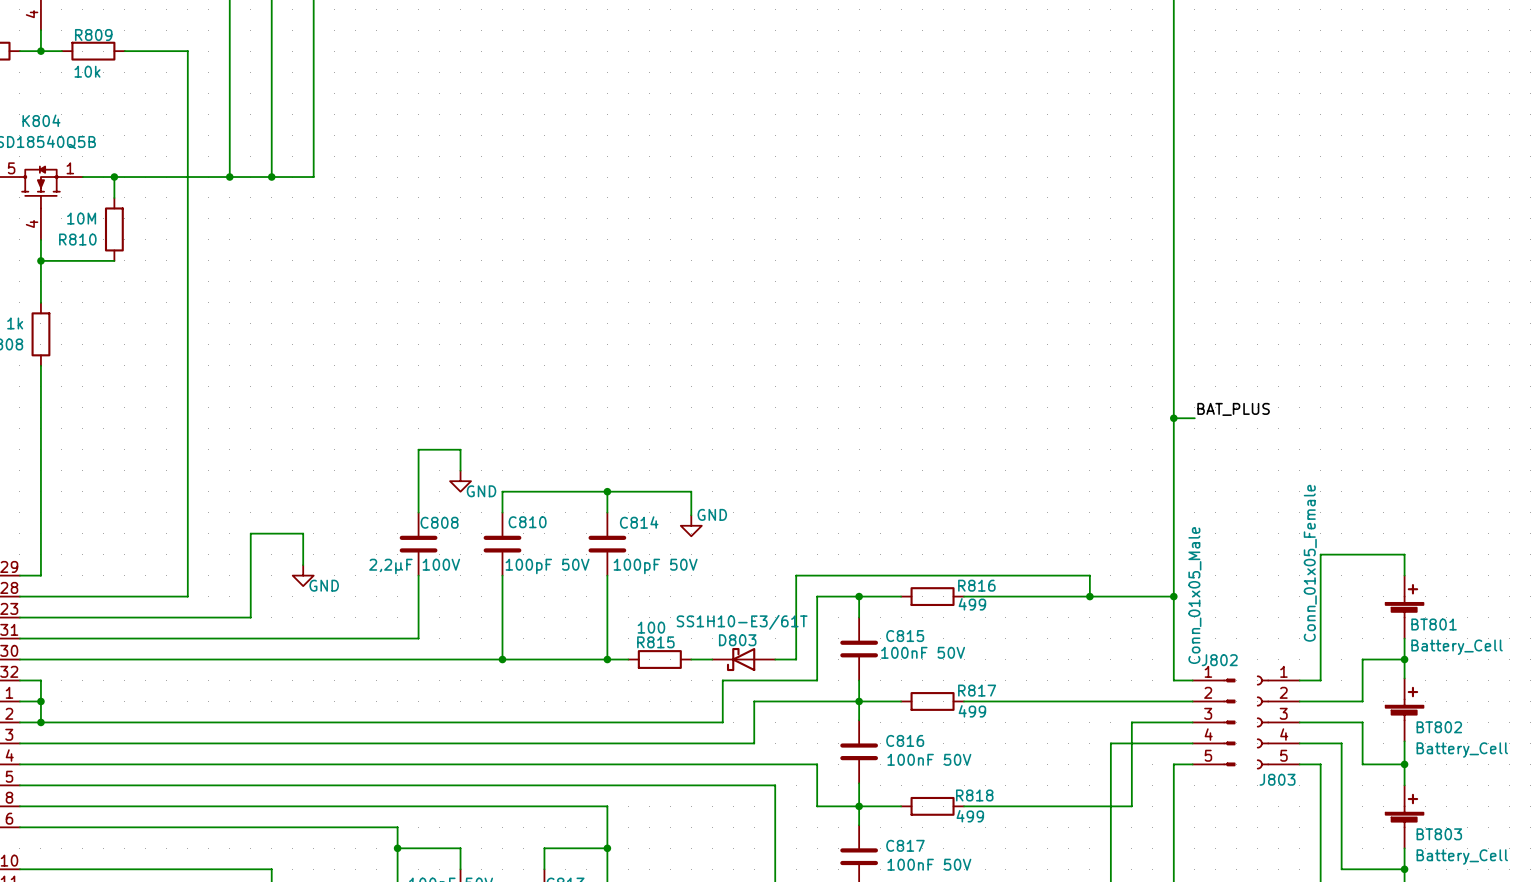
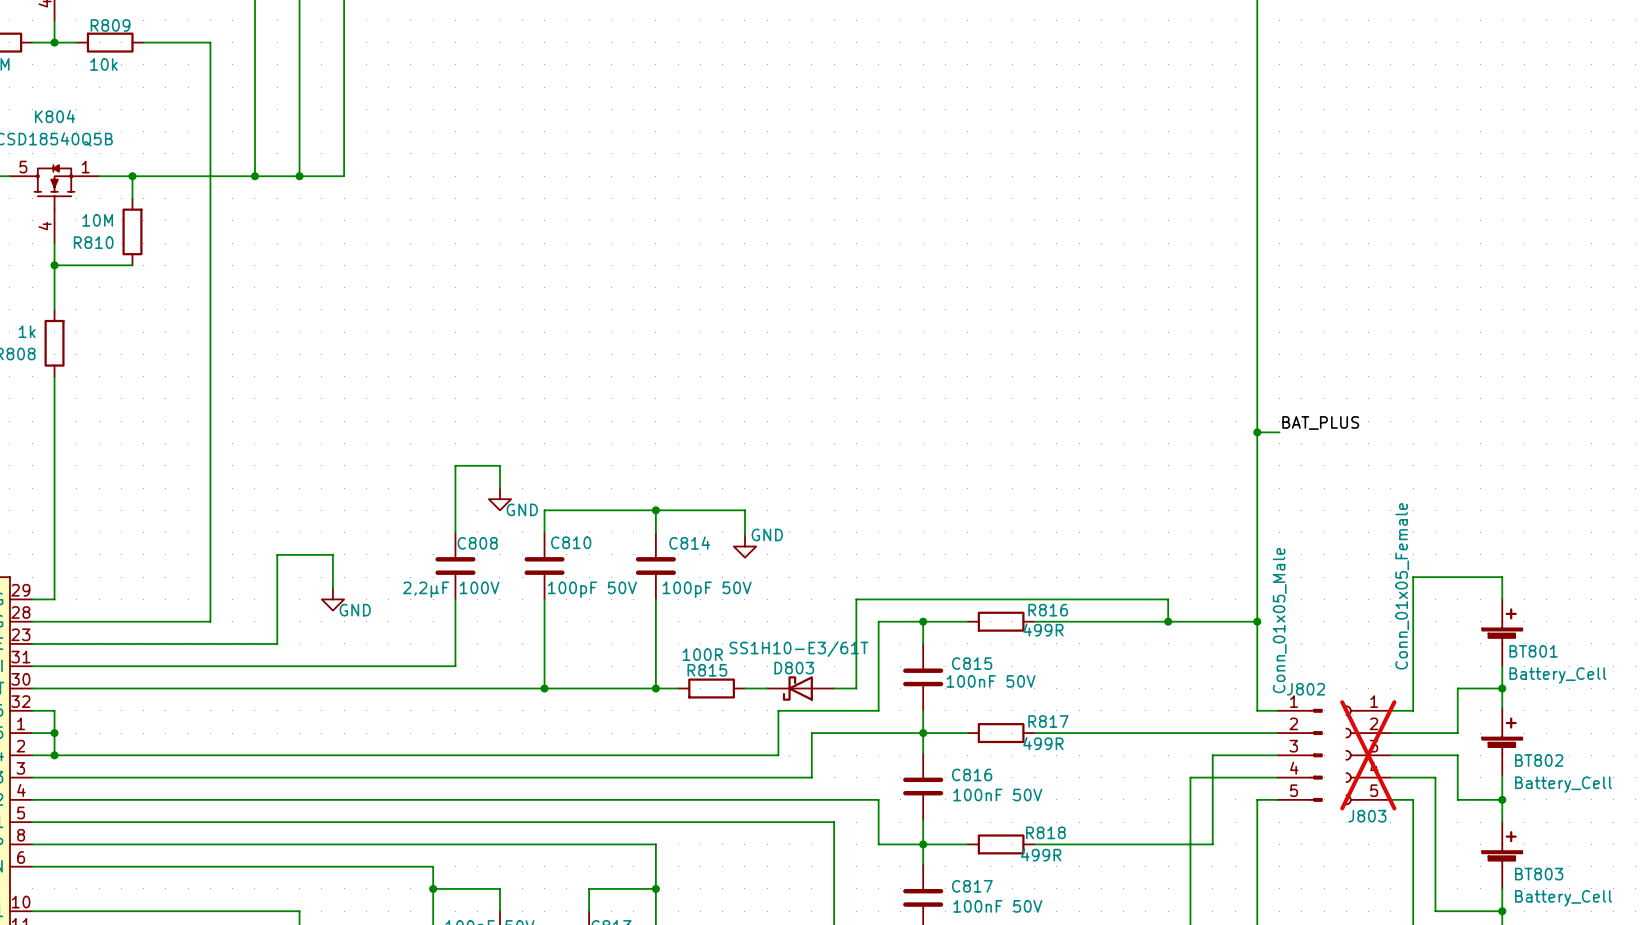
R816 value: 499 (972, 604) -> 499R (1043, 629)
R815 value: 100 (651, 627) -> 100R (702, 654)
R817 value: 499 (972, 711) -> 499R (1043, 743)
J803 do-not-place cross: none -> (1368, 755)
R818 value: 499 (970, 816) -> 499R (1041, 854)

